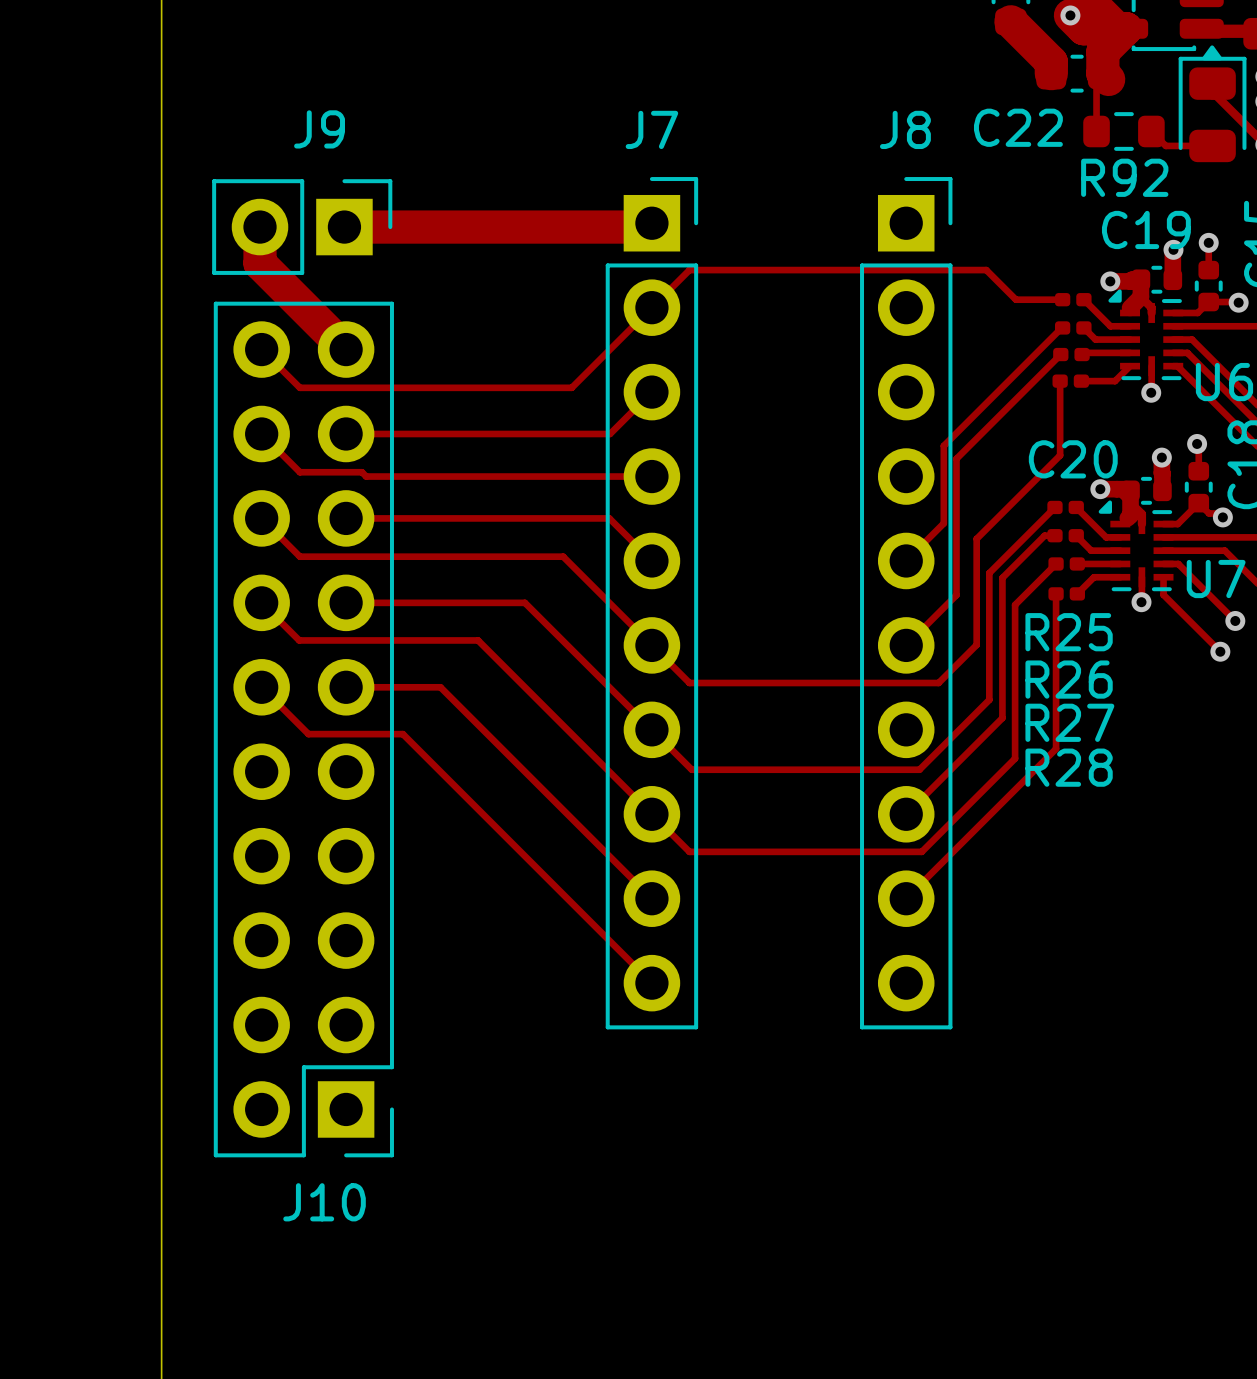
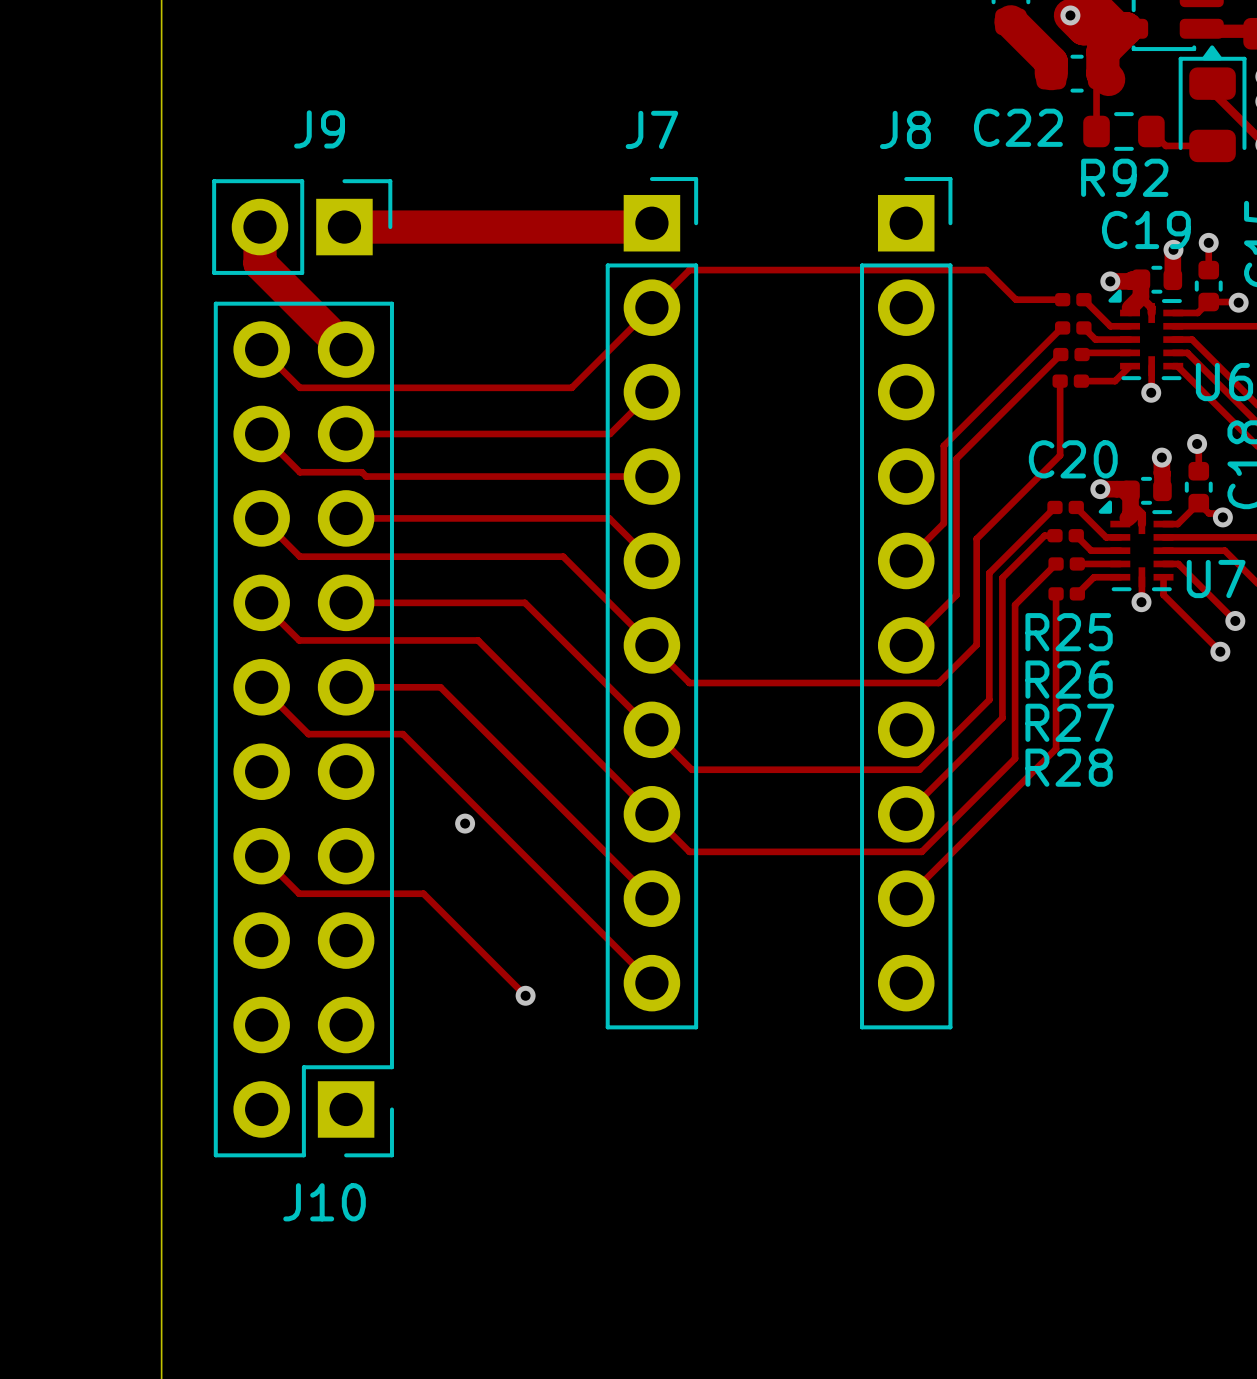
via: none -> (465, 823)
track: none -> (261, 856) (299, 893) (423, 893) (525, 995)
via: none -> (525, 995)

